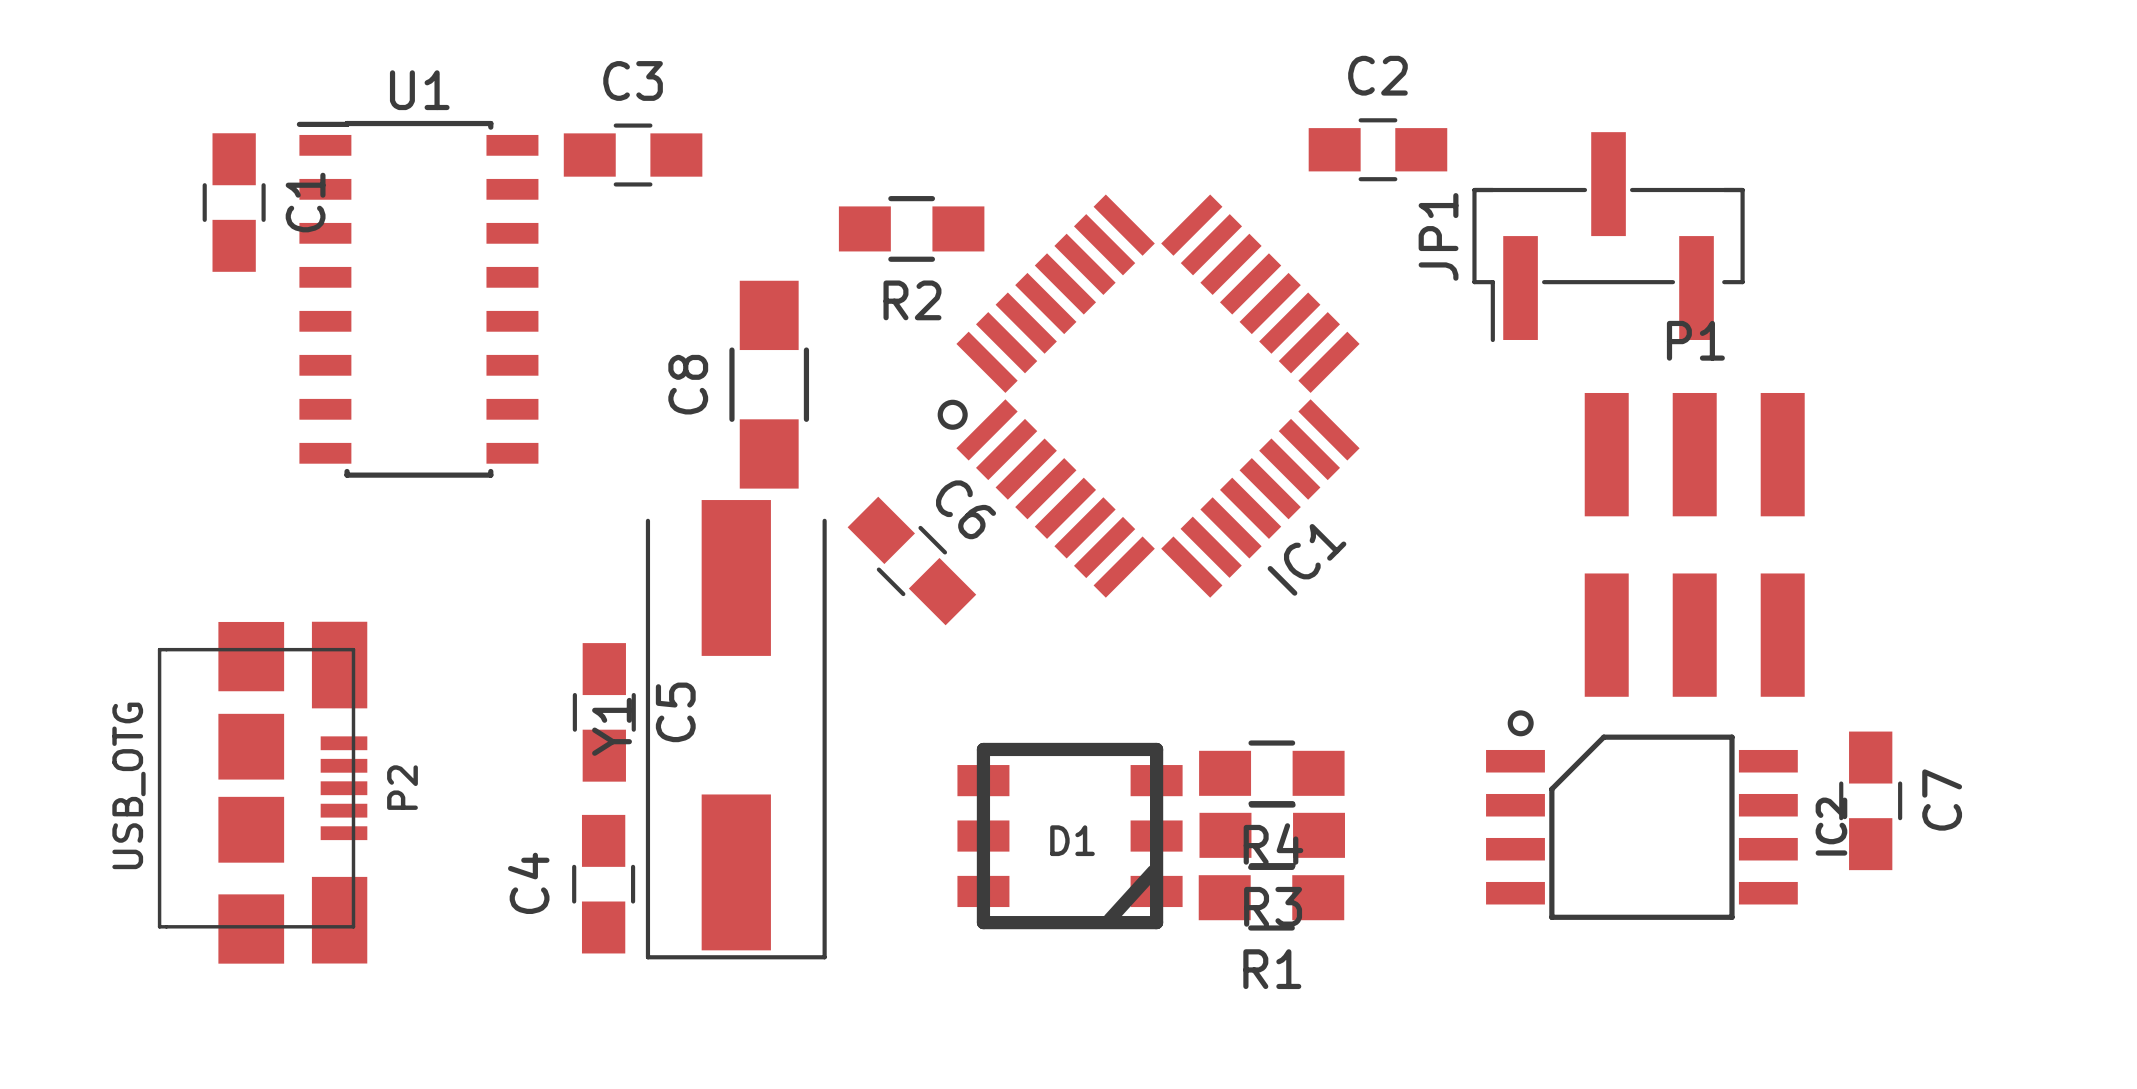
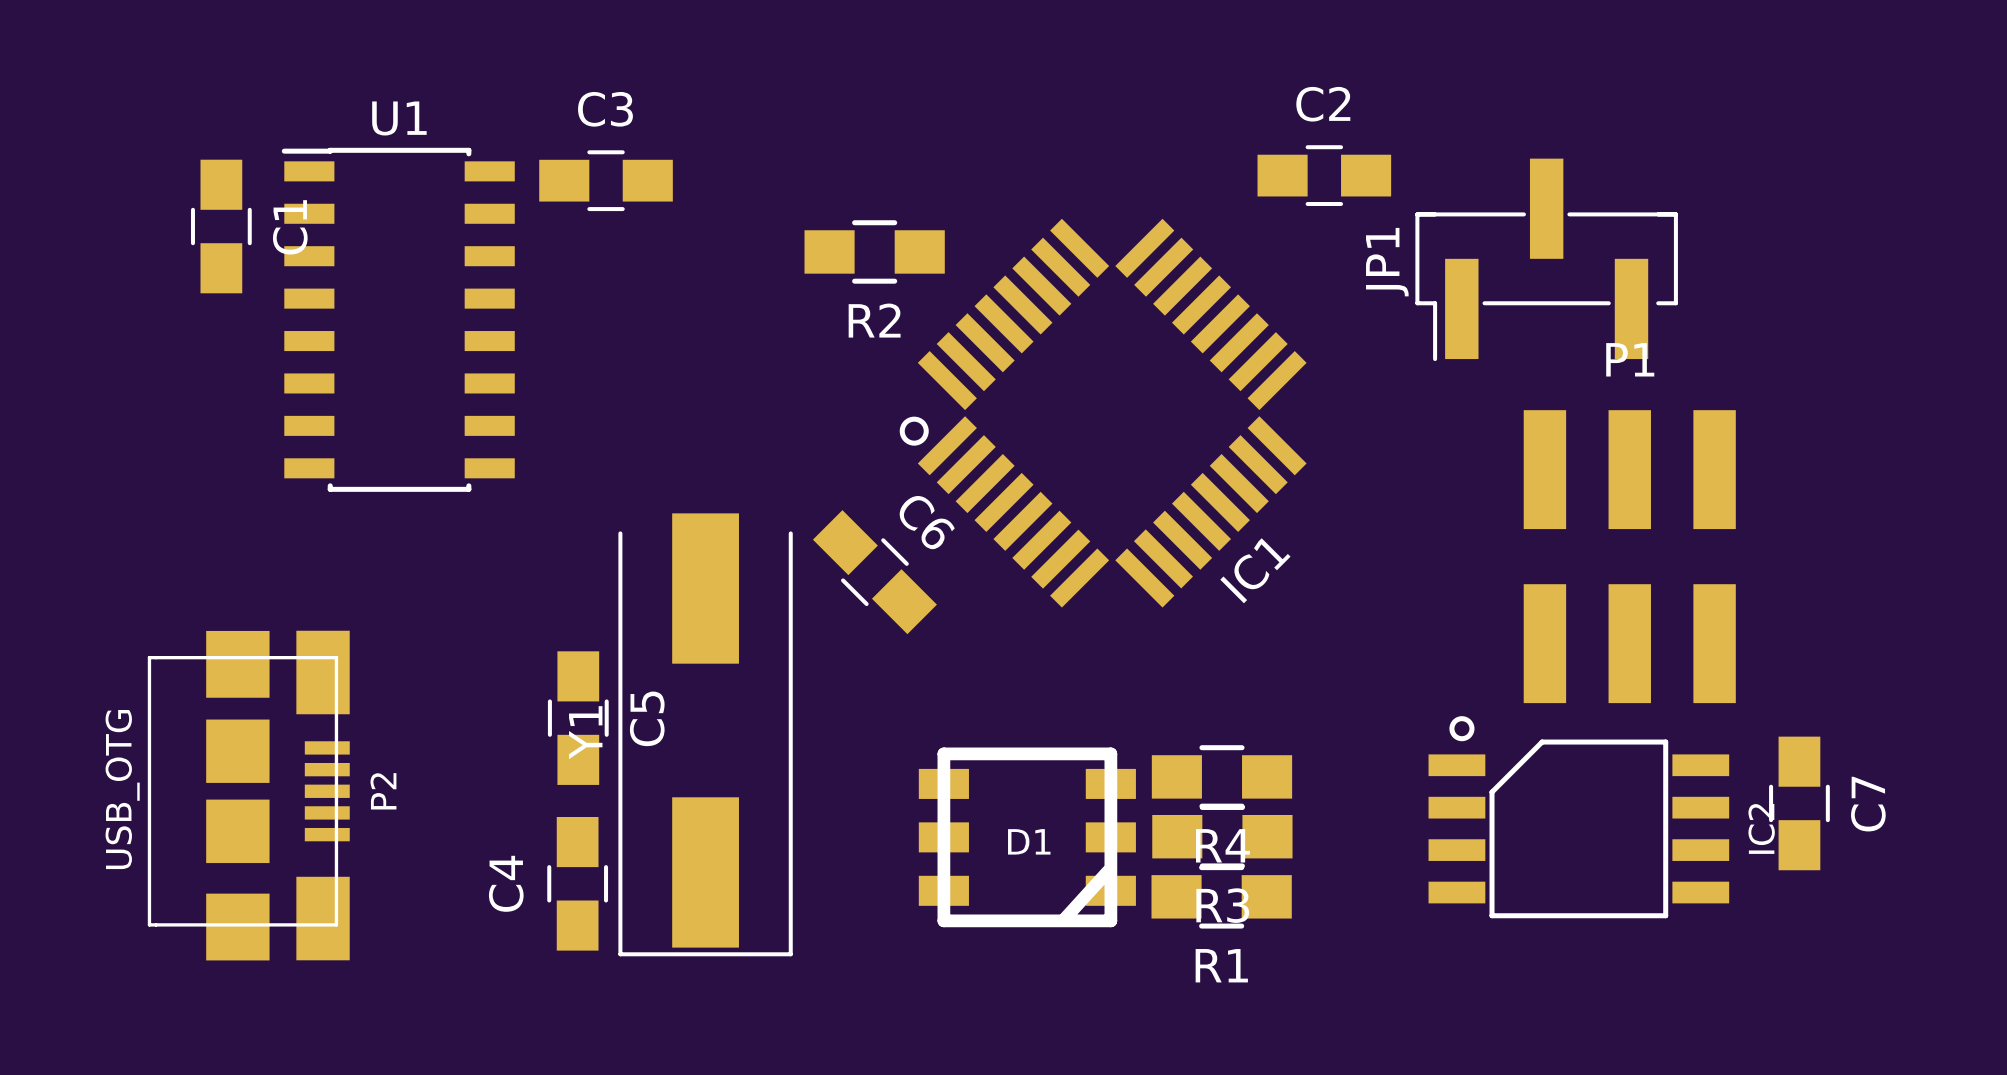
C8: (769, 384) -> none

